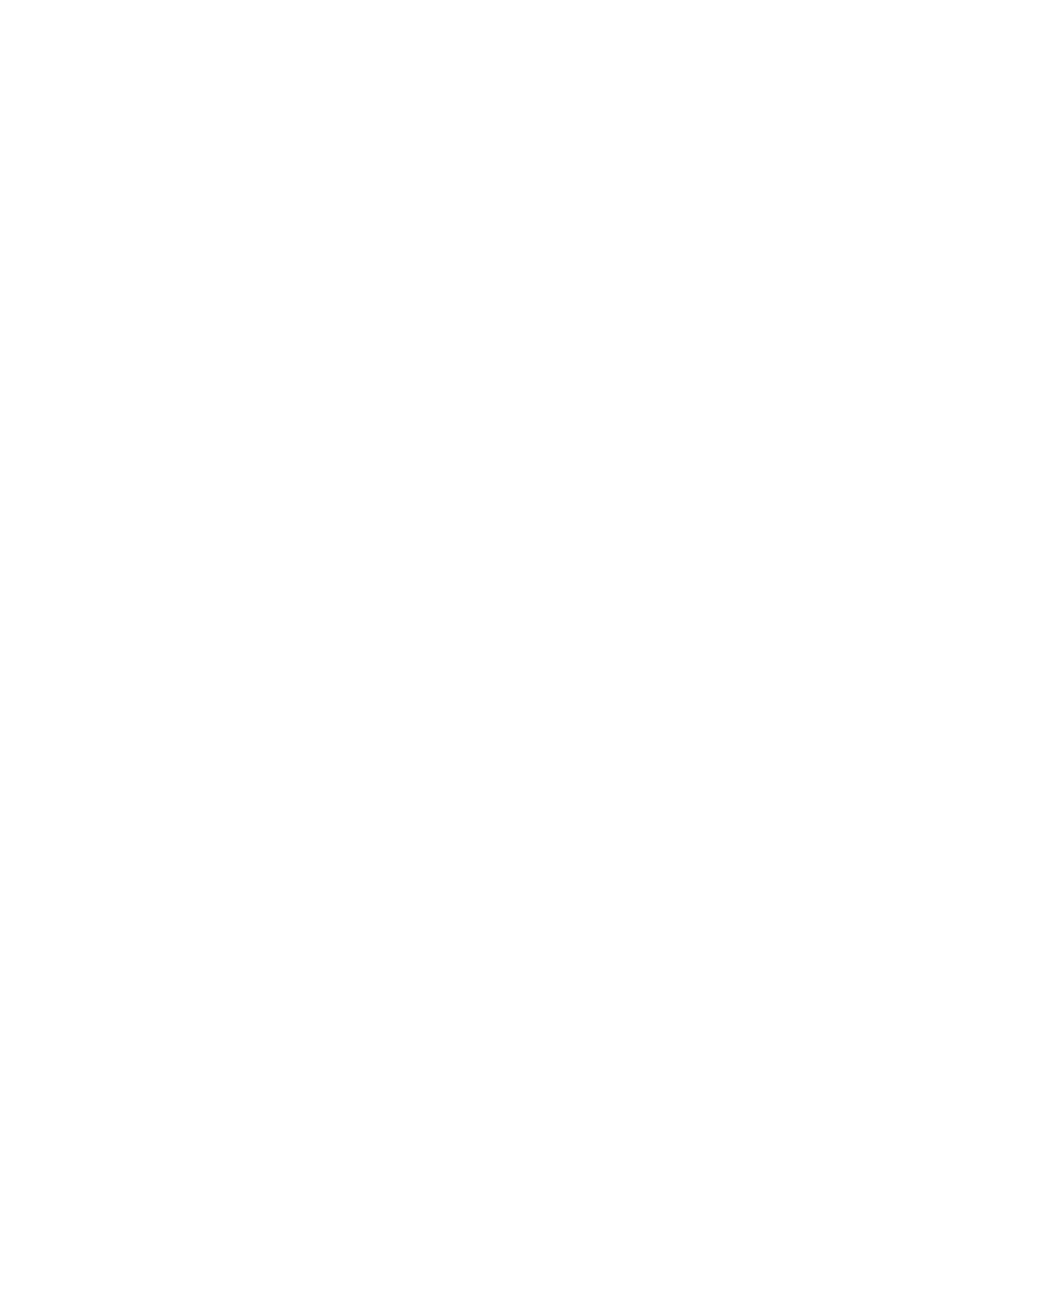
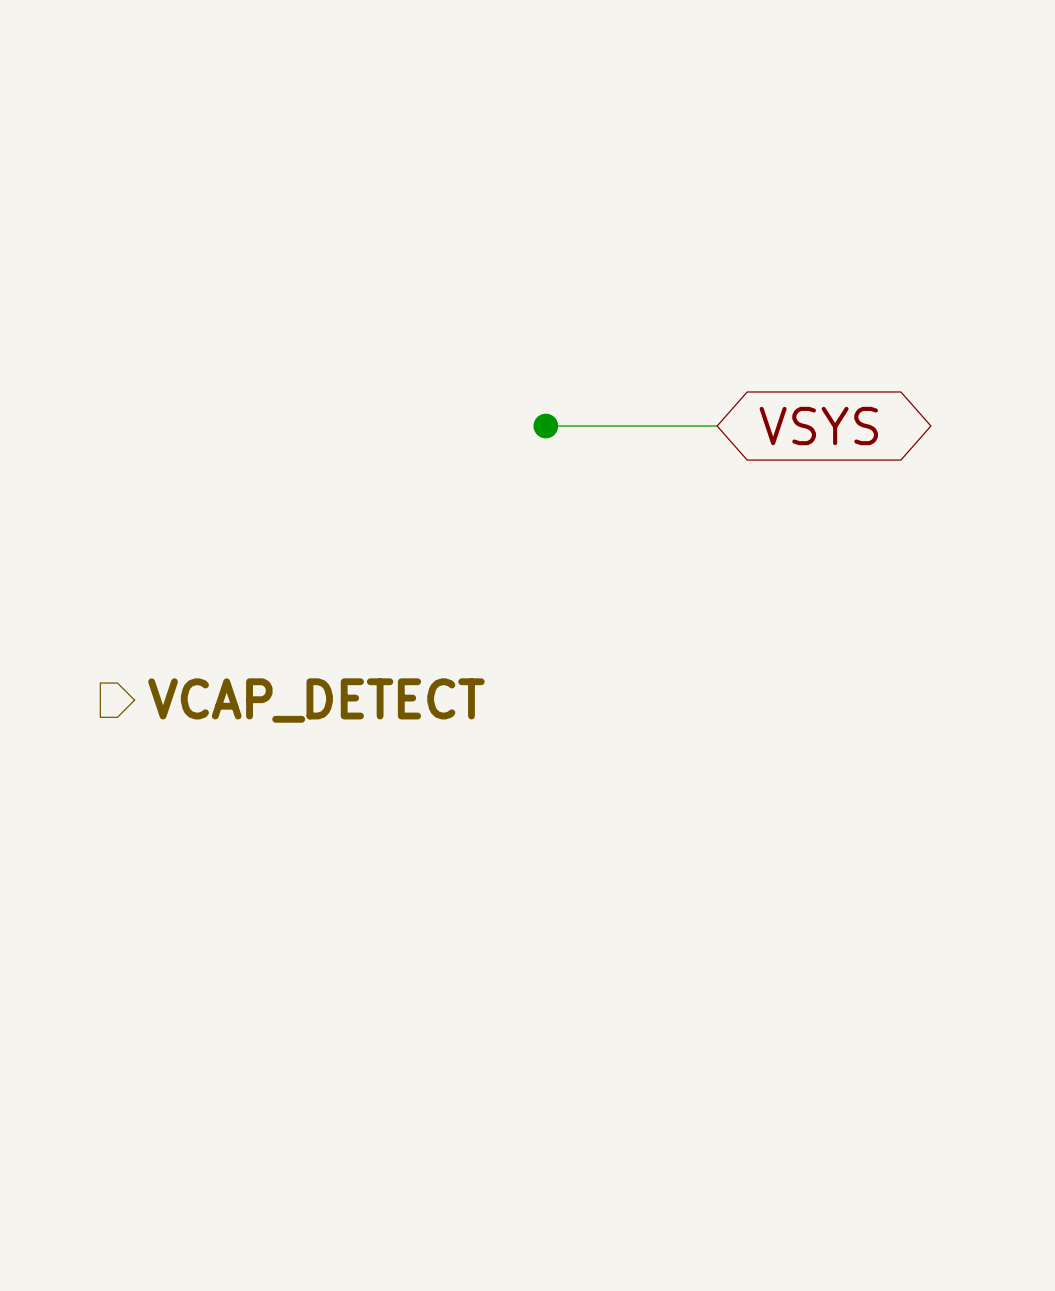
wire: none -> (545, 426) (717, 426)
junction: none -> (545, 426)
global label: none -> VSYS (818, 426)
hierarchical label: none -> VCAP_DETECT (316, 700)

